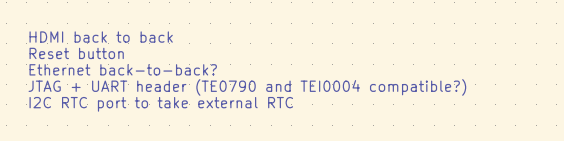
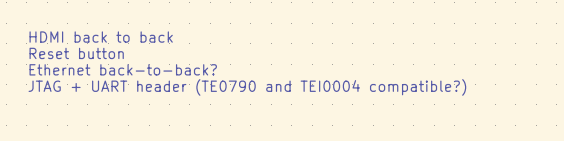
text: I2C RTC port to take external RTC (161, 104) -> none

